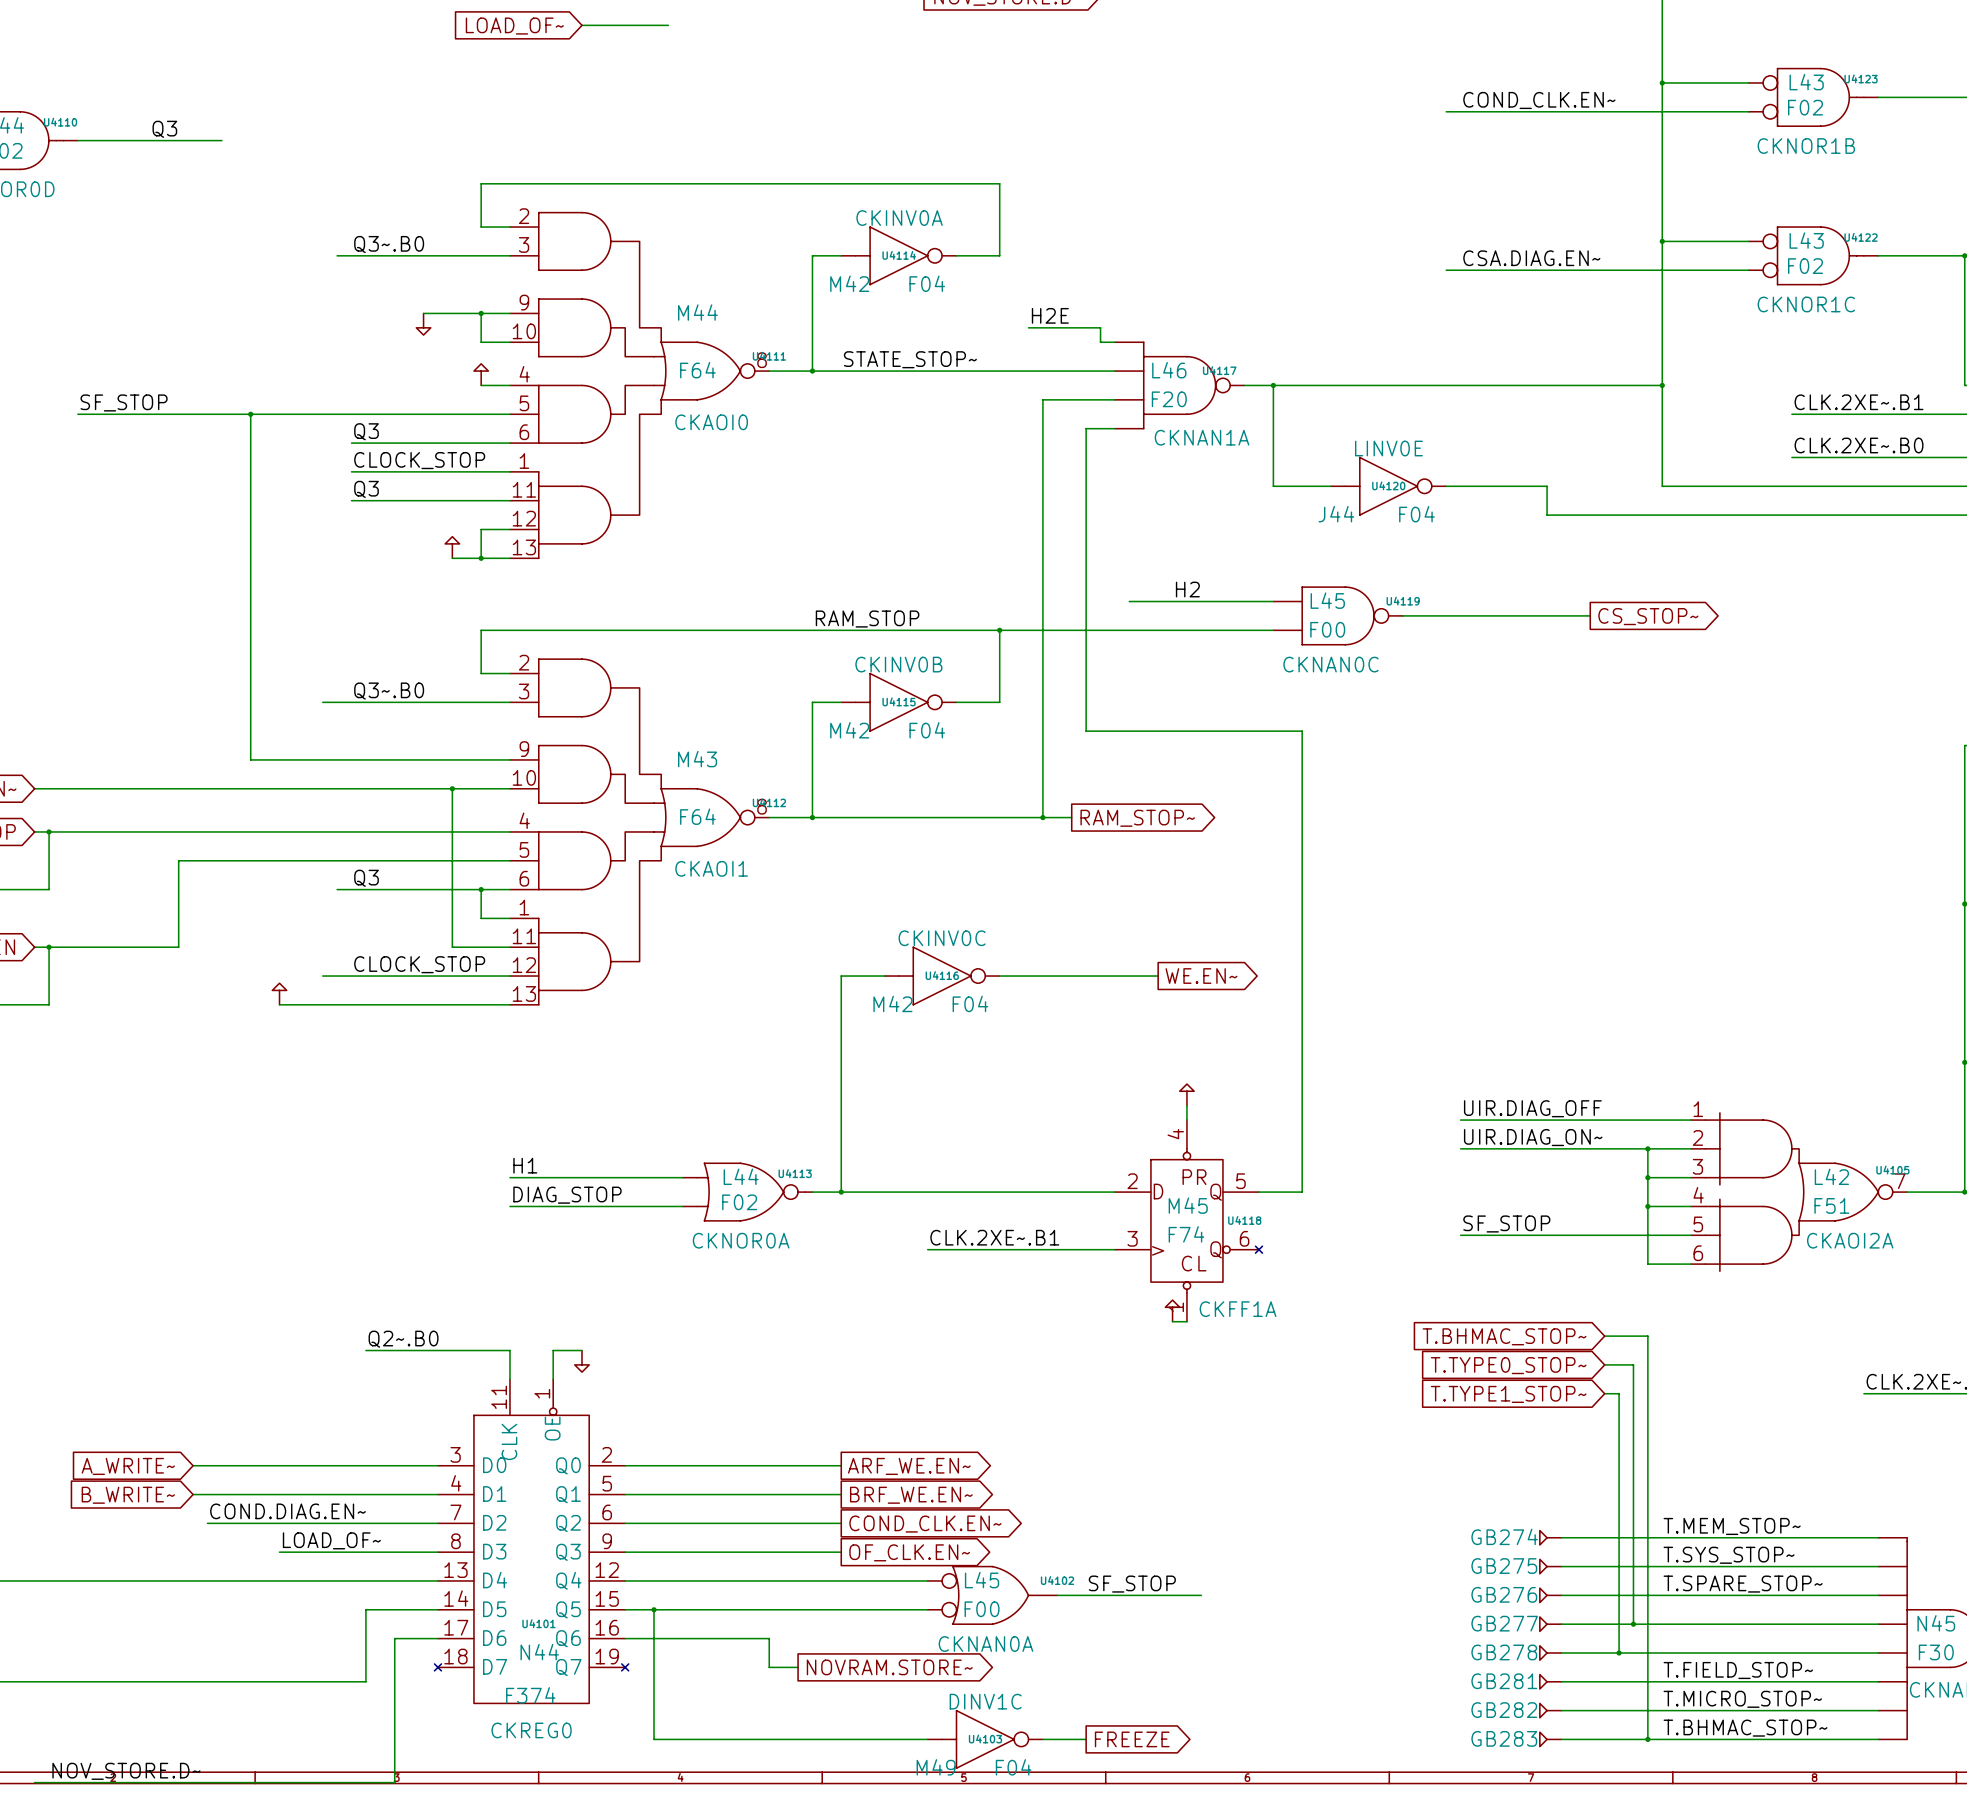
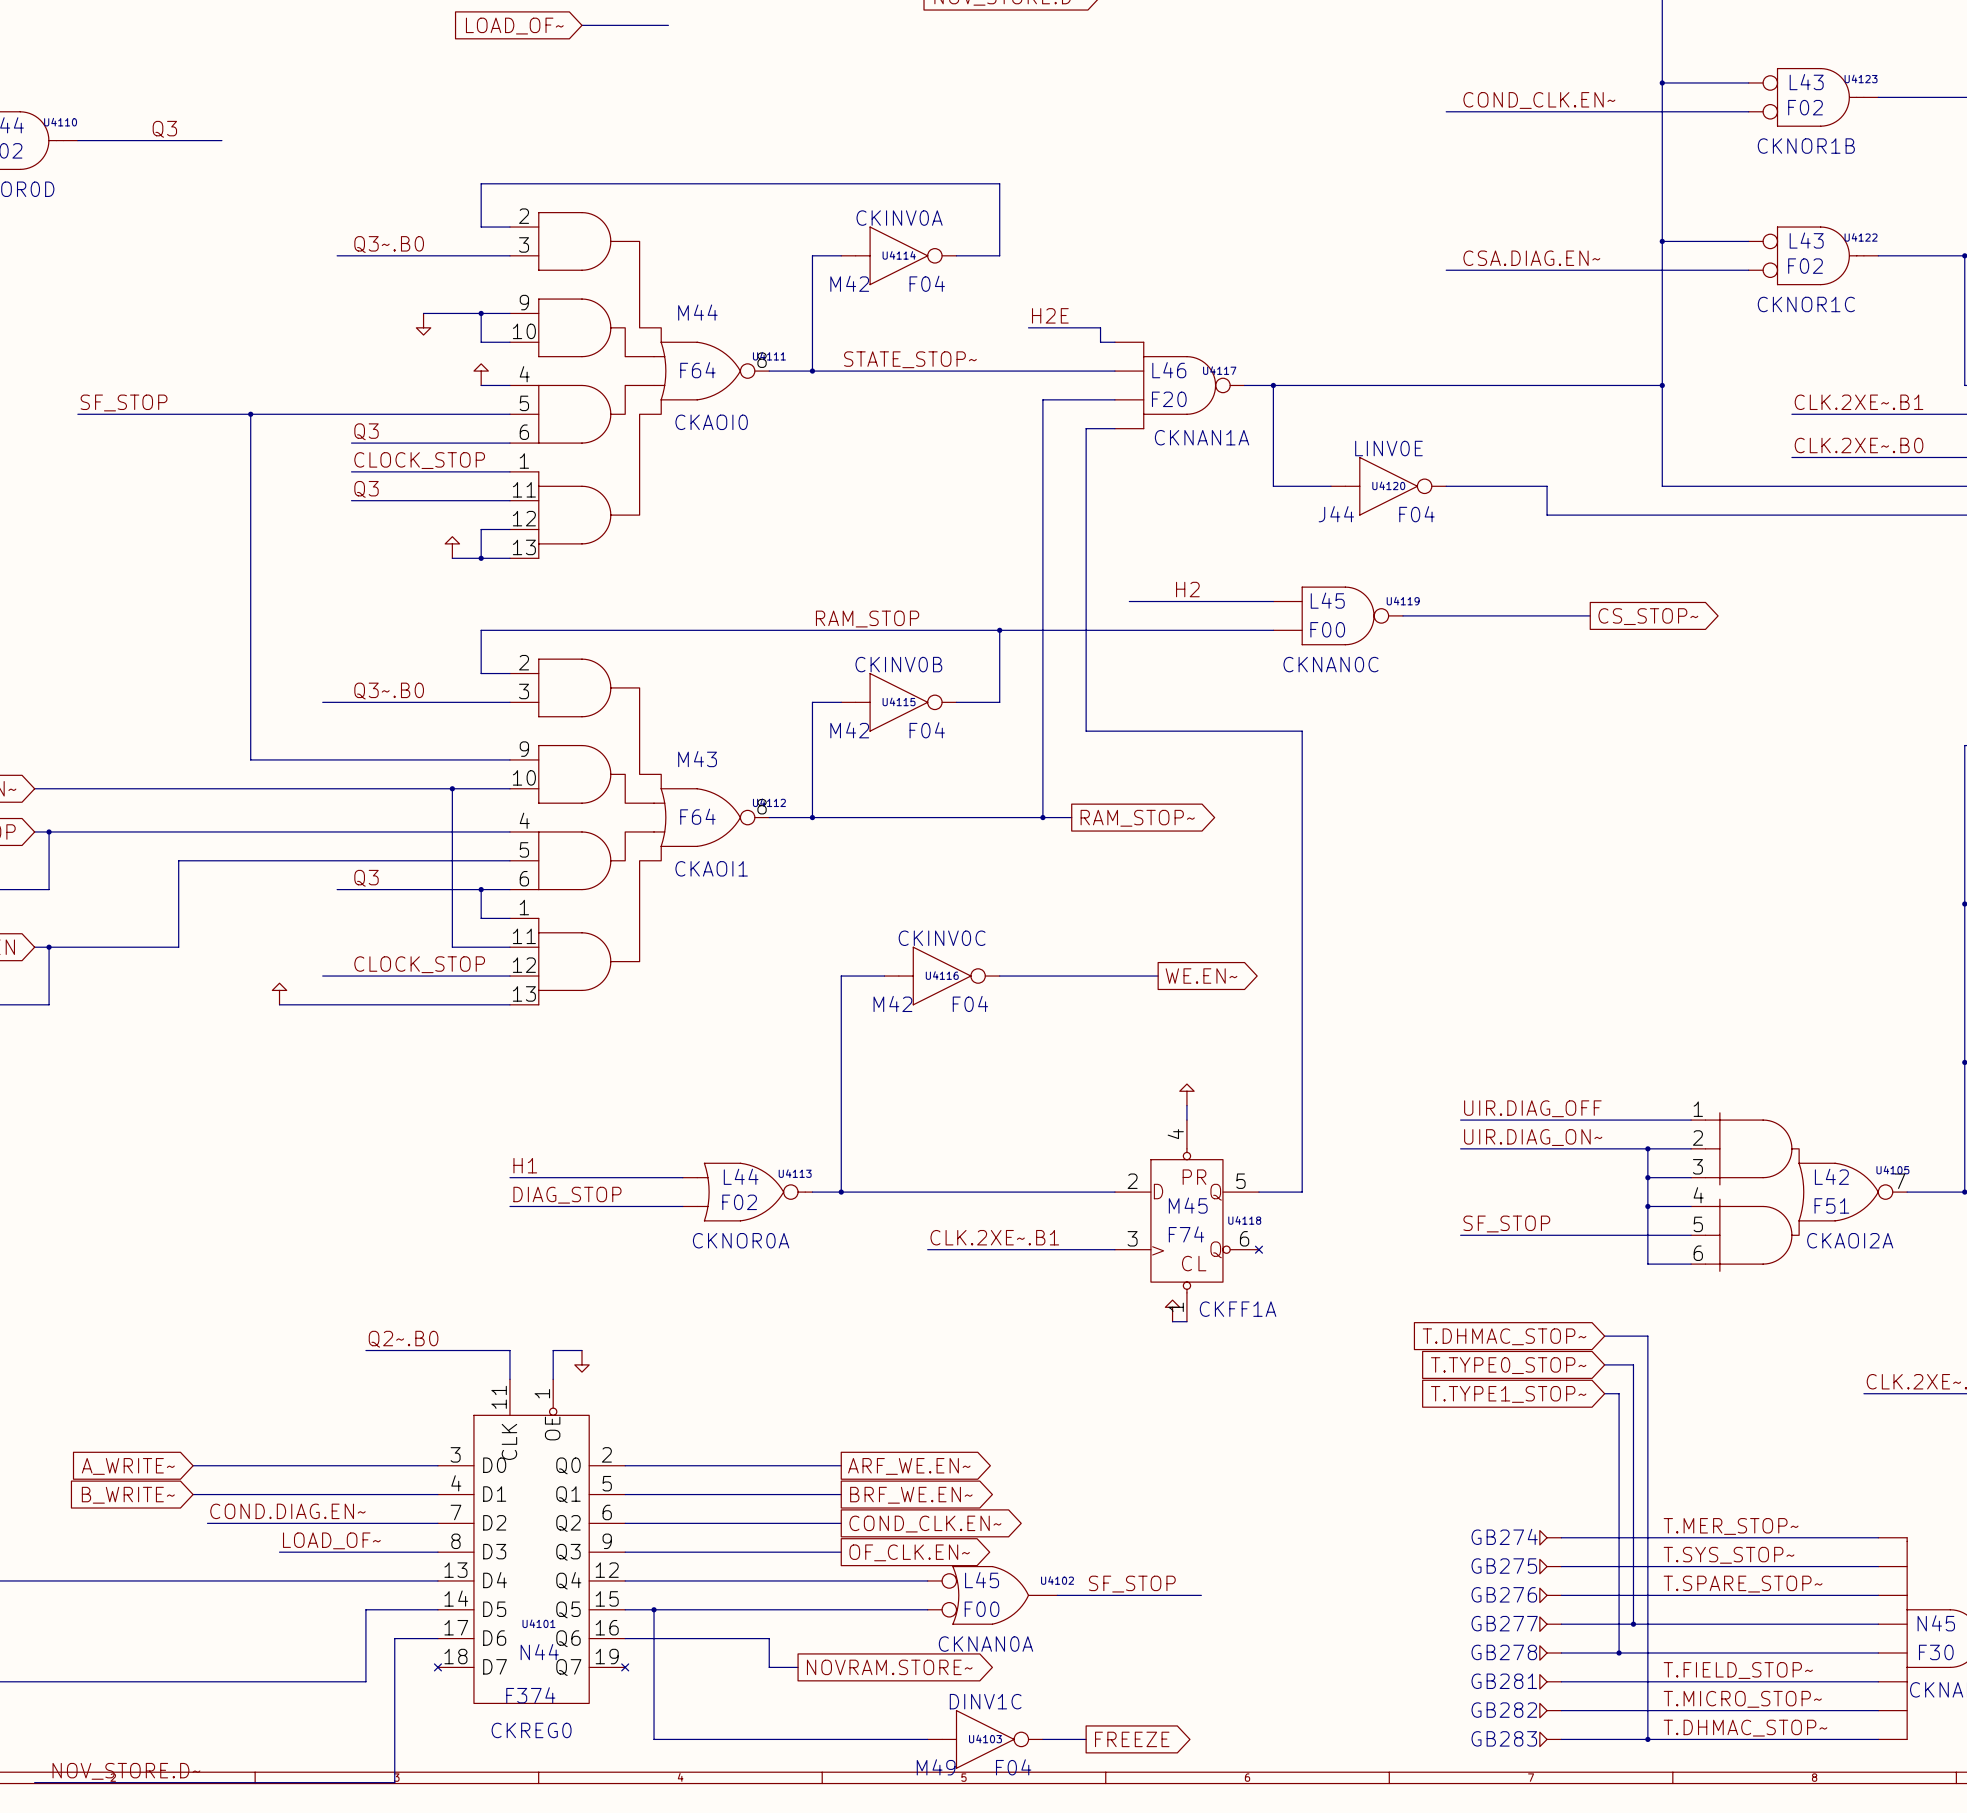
global label: T.BHMAC_STOP~ (1504, 1336) -> T.DHMAC_STOP~ (1504, 1336)
label: T.MEM_STOP~ (1732, 1526) -> T.MER_STOP~ (1731, 1526)
label: T.BHMAC_STOP~ (1745, 1728) -> T.DHMAC_STOP~ (1745, 1728)

